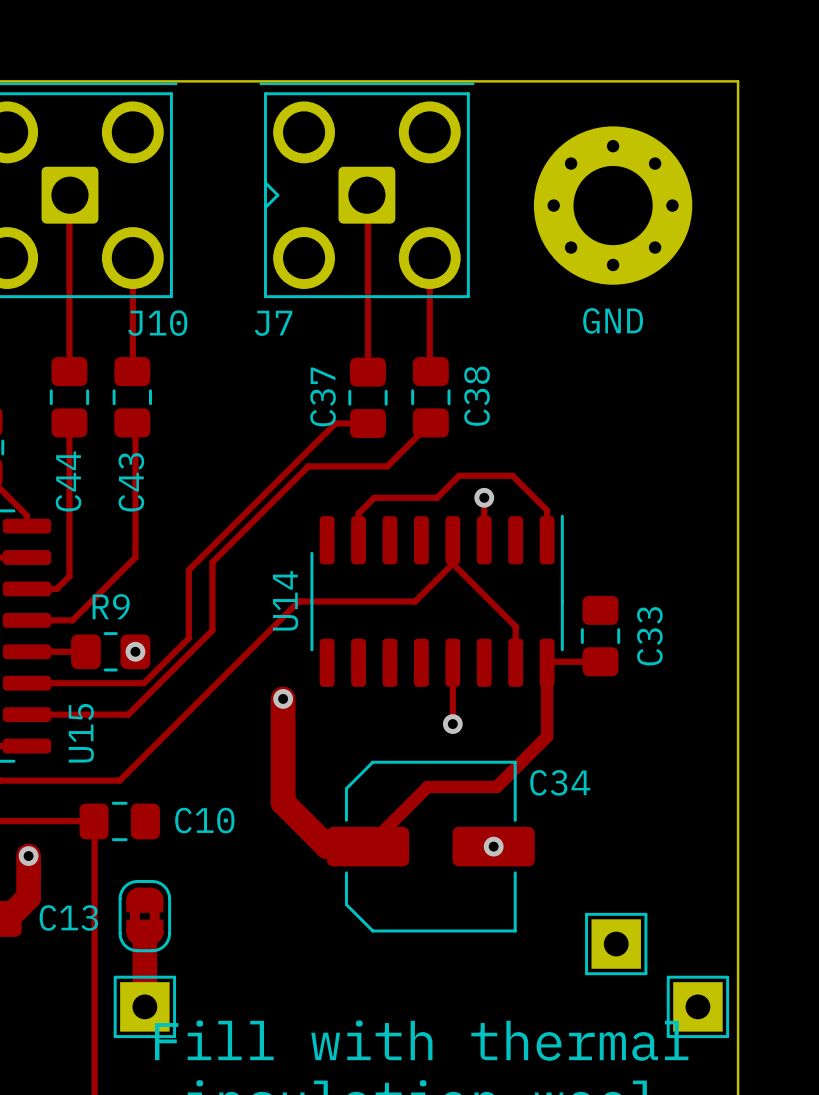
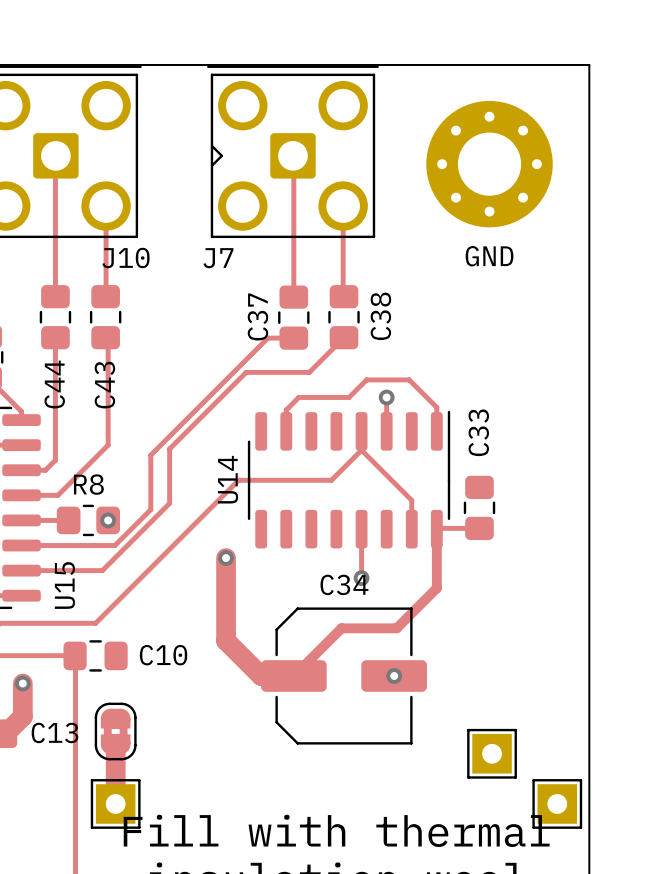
R9 name: R9 (111, 606) -> R8 (88, 484)
C33 name position: C33 (649, 636) -> C33 (478, 432)
C34 name position: C34 (560, 782) -> C34 (344, 584)

